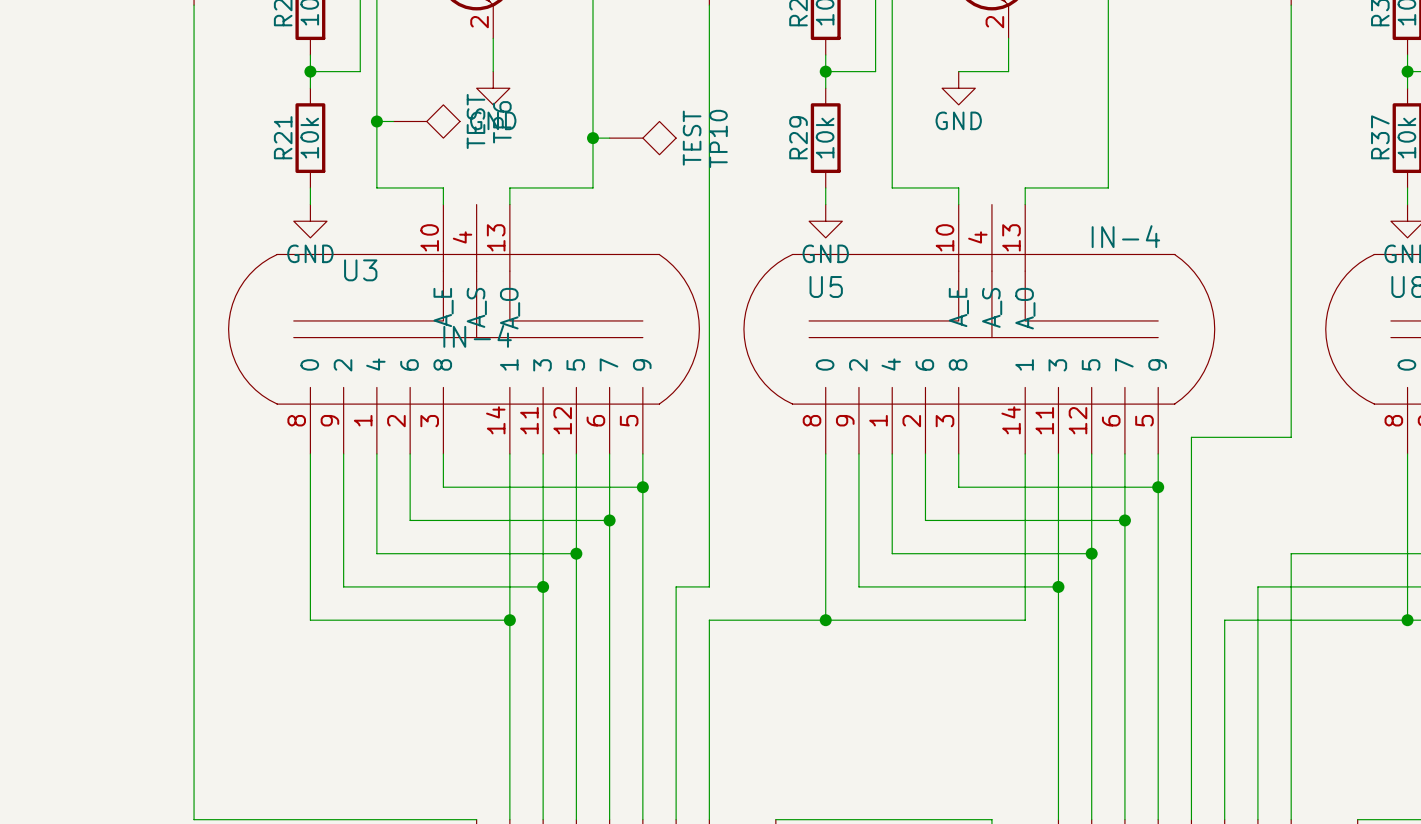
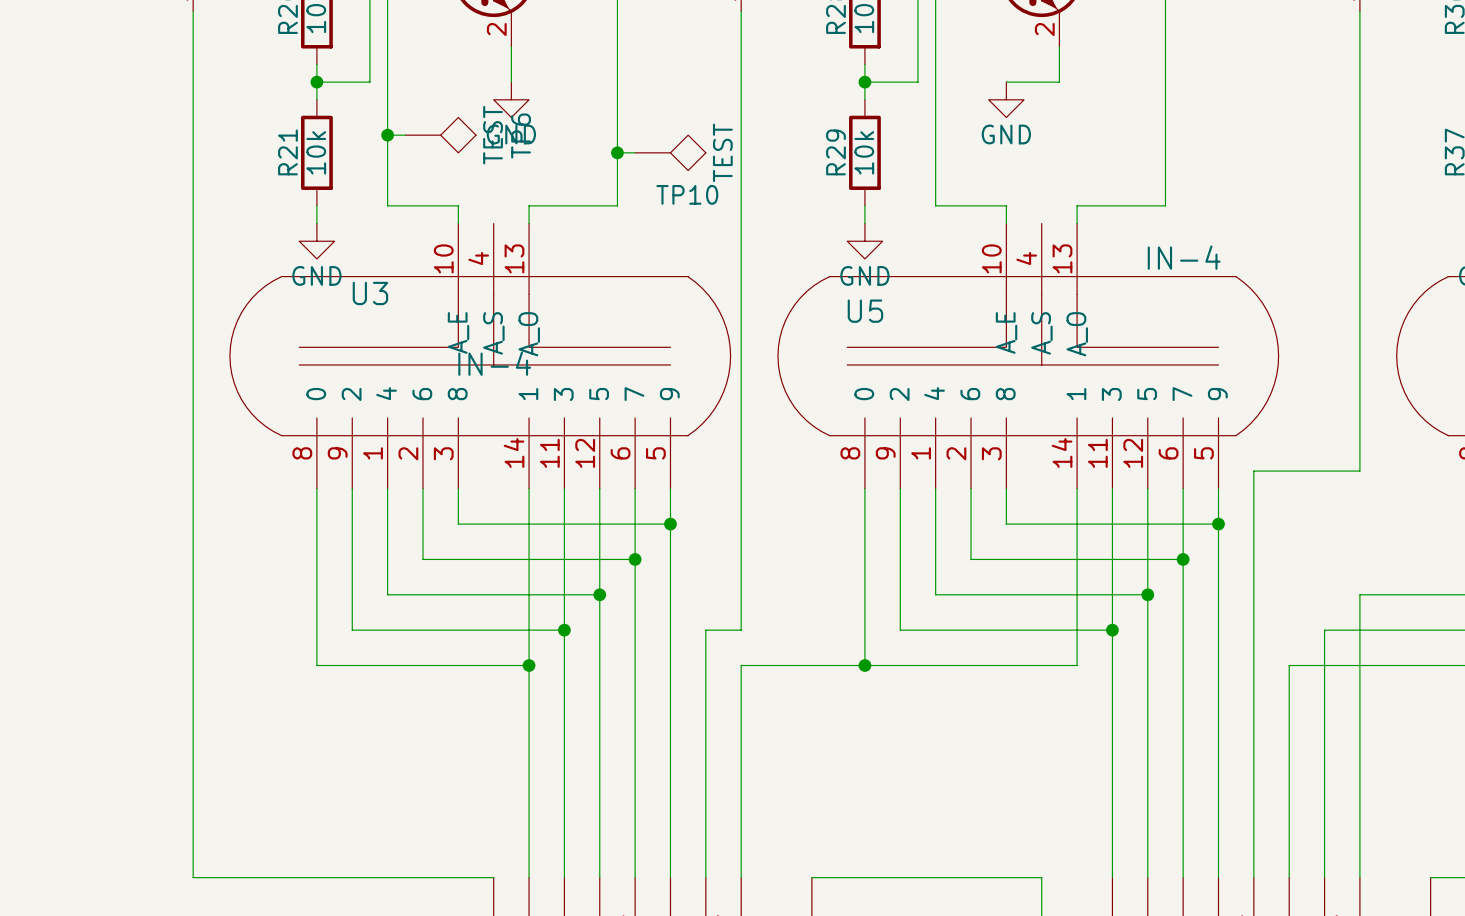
TP10 name rotation: 0° (718, 138) -> 90° clockwise (687, 194)
TP10 name position: TP10 (718, 138) -> TP10 (687, 194)

